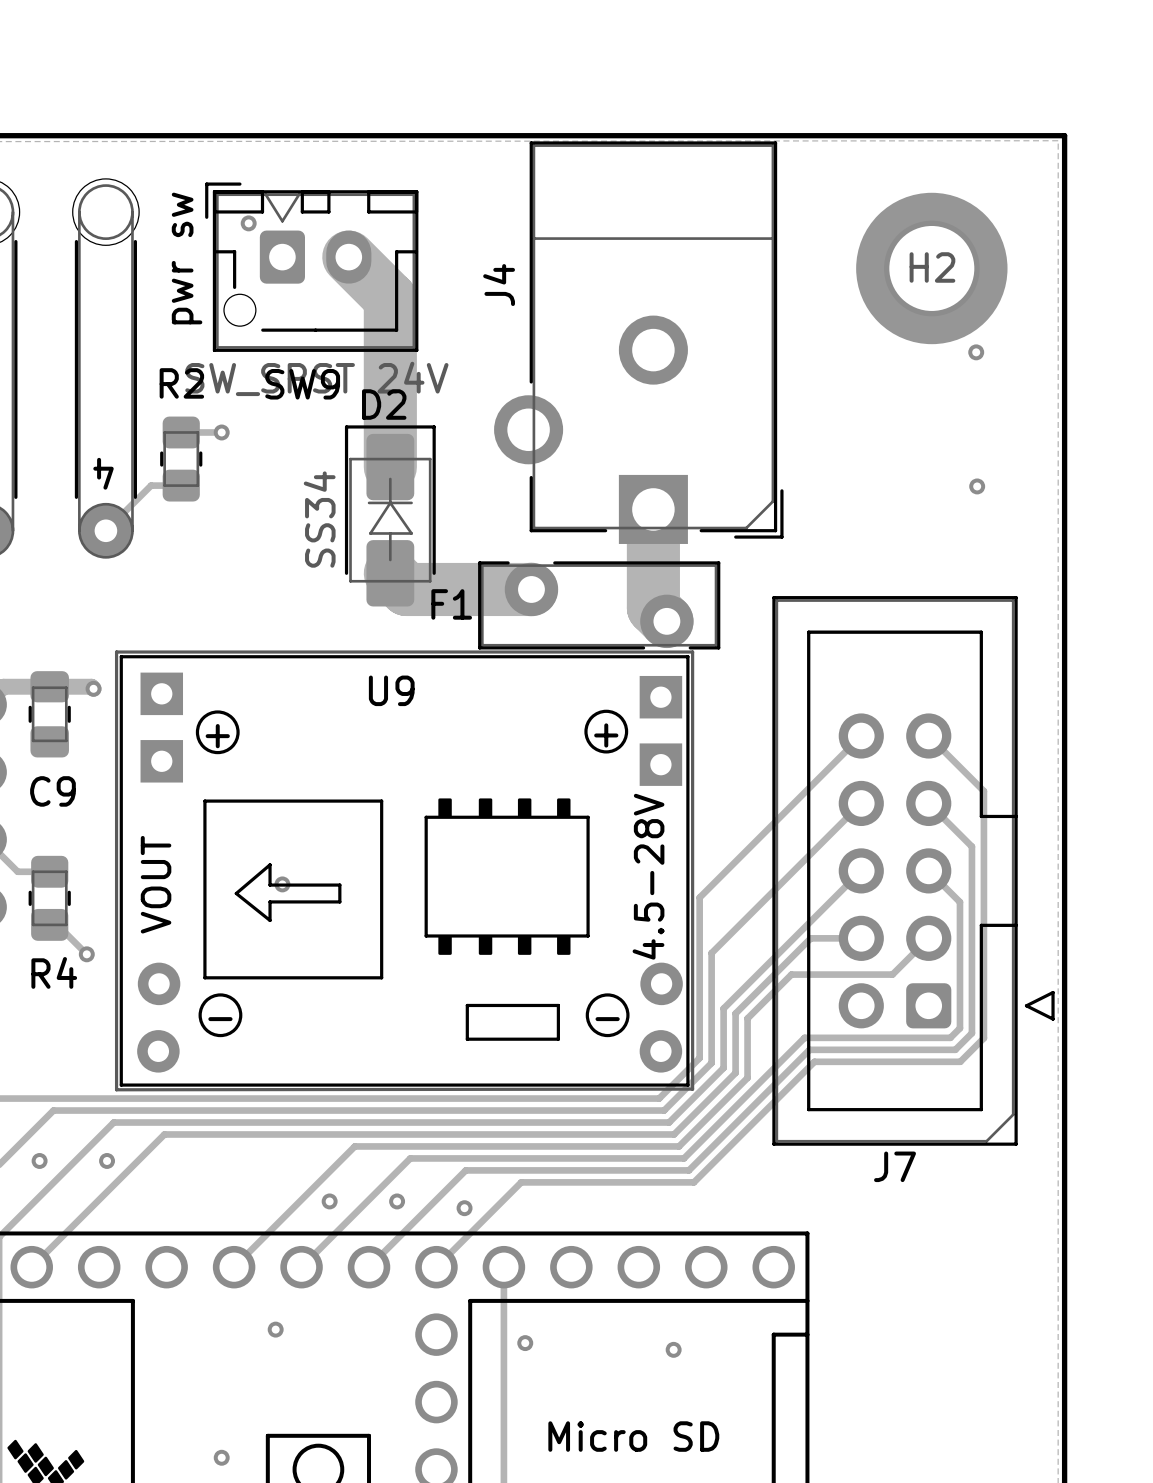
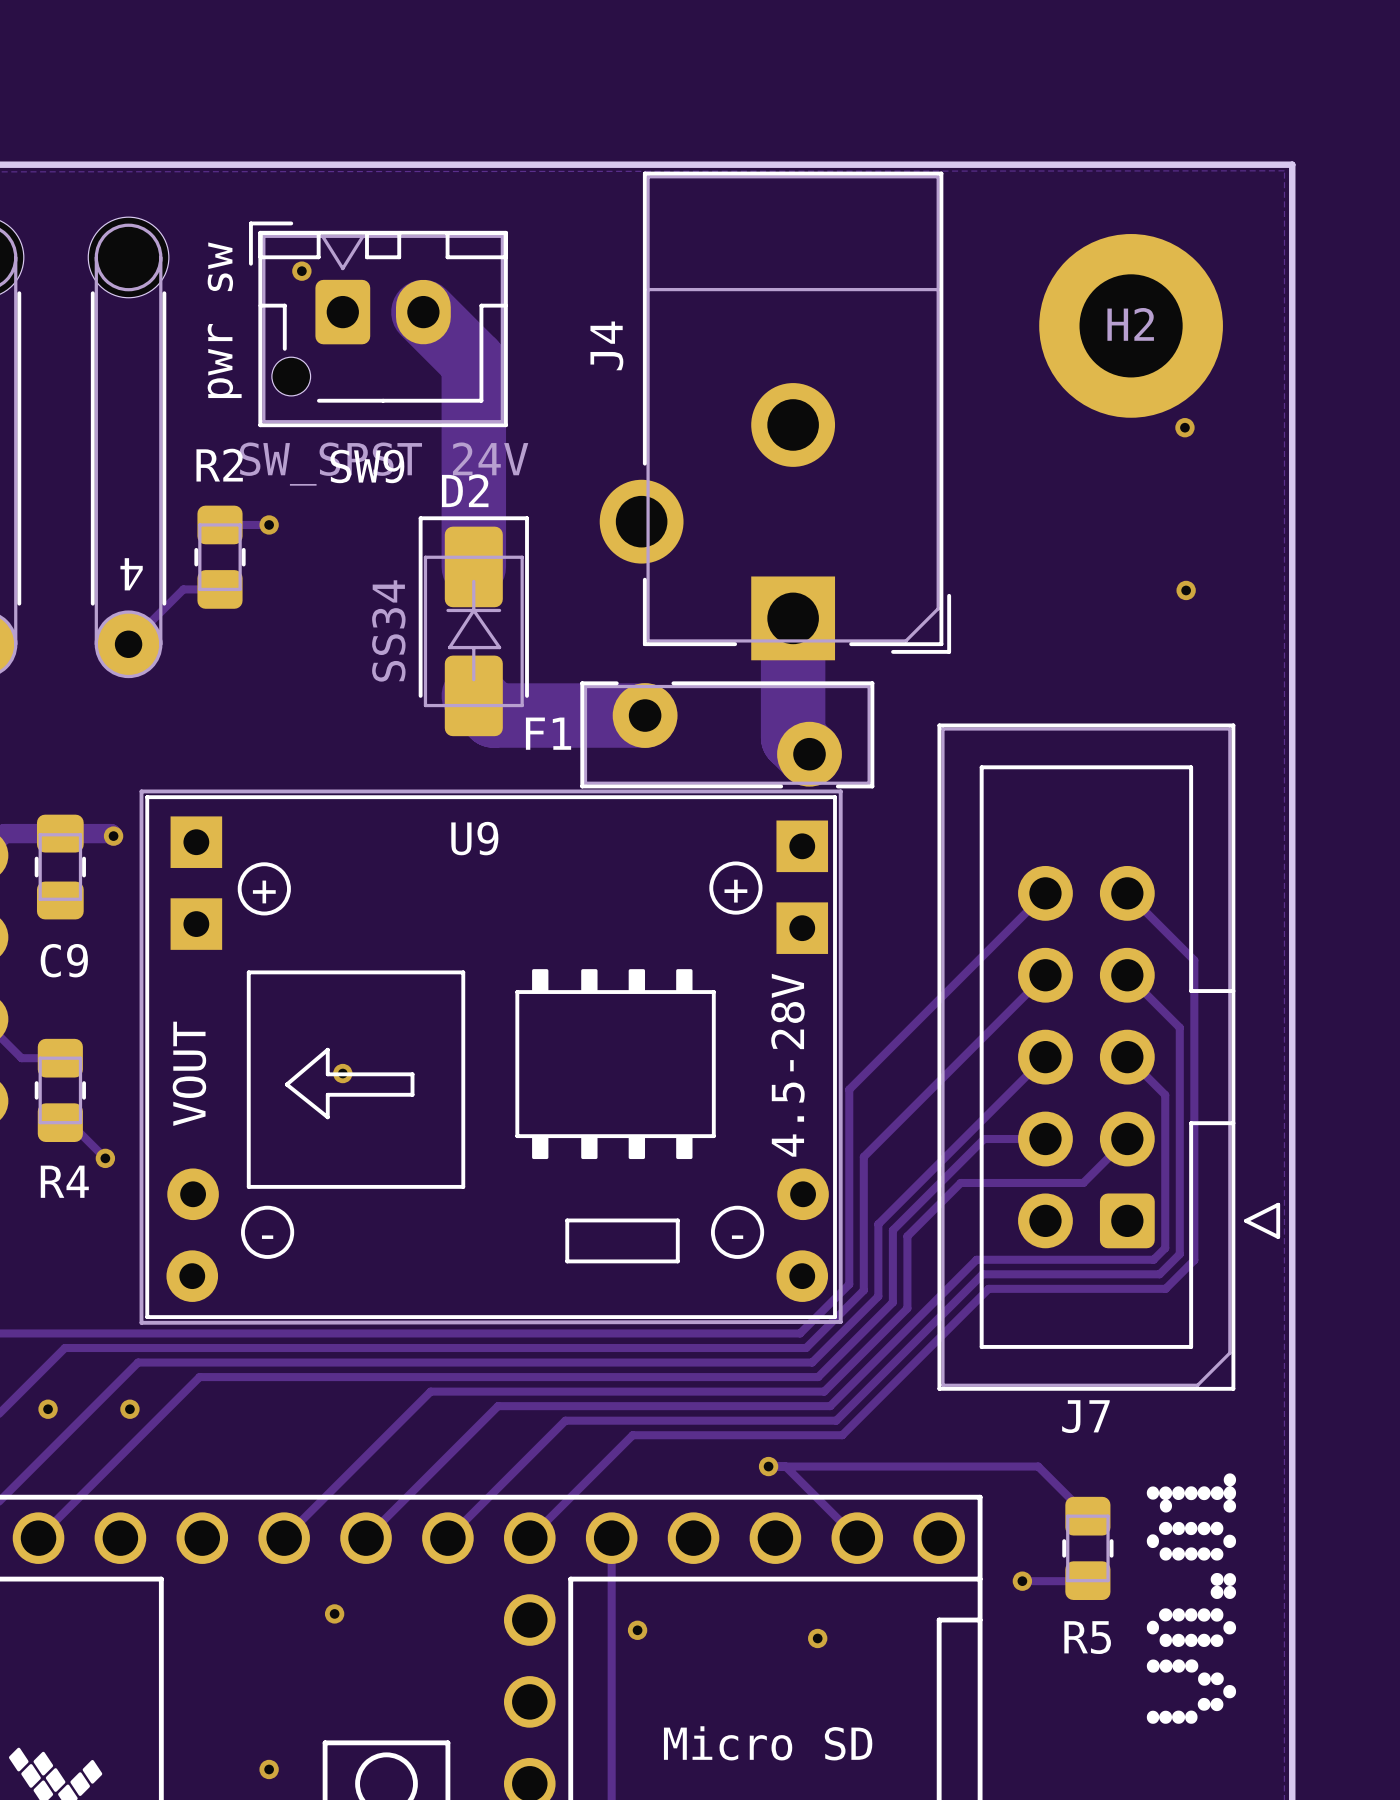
via: (329, 1201) -> none
via: (397, 1201) -> none
via: (464, 1208) -> none
track: none -> (768, 1466) (1038, 1466) (1087, 1516)
via: none -> (768, 1466)
track: none -> (785, 1466) (857, 1538)
drawing: none -> [1146, 1473, 1237, 1724]
R5: none -> (1087, 1548)
track: none -> (1022, 1581) (1087, 1581)
via: none -> (1022, 1581)

